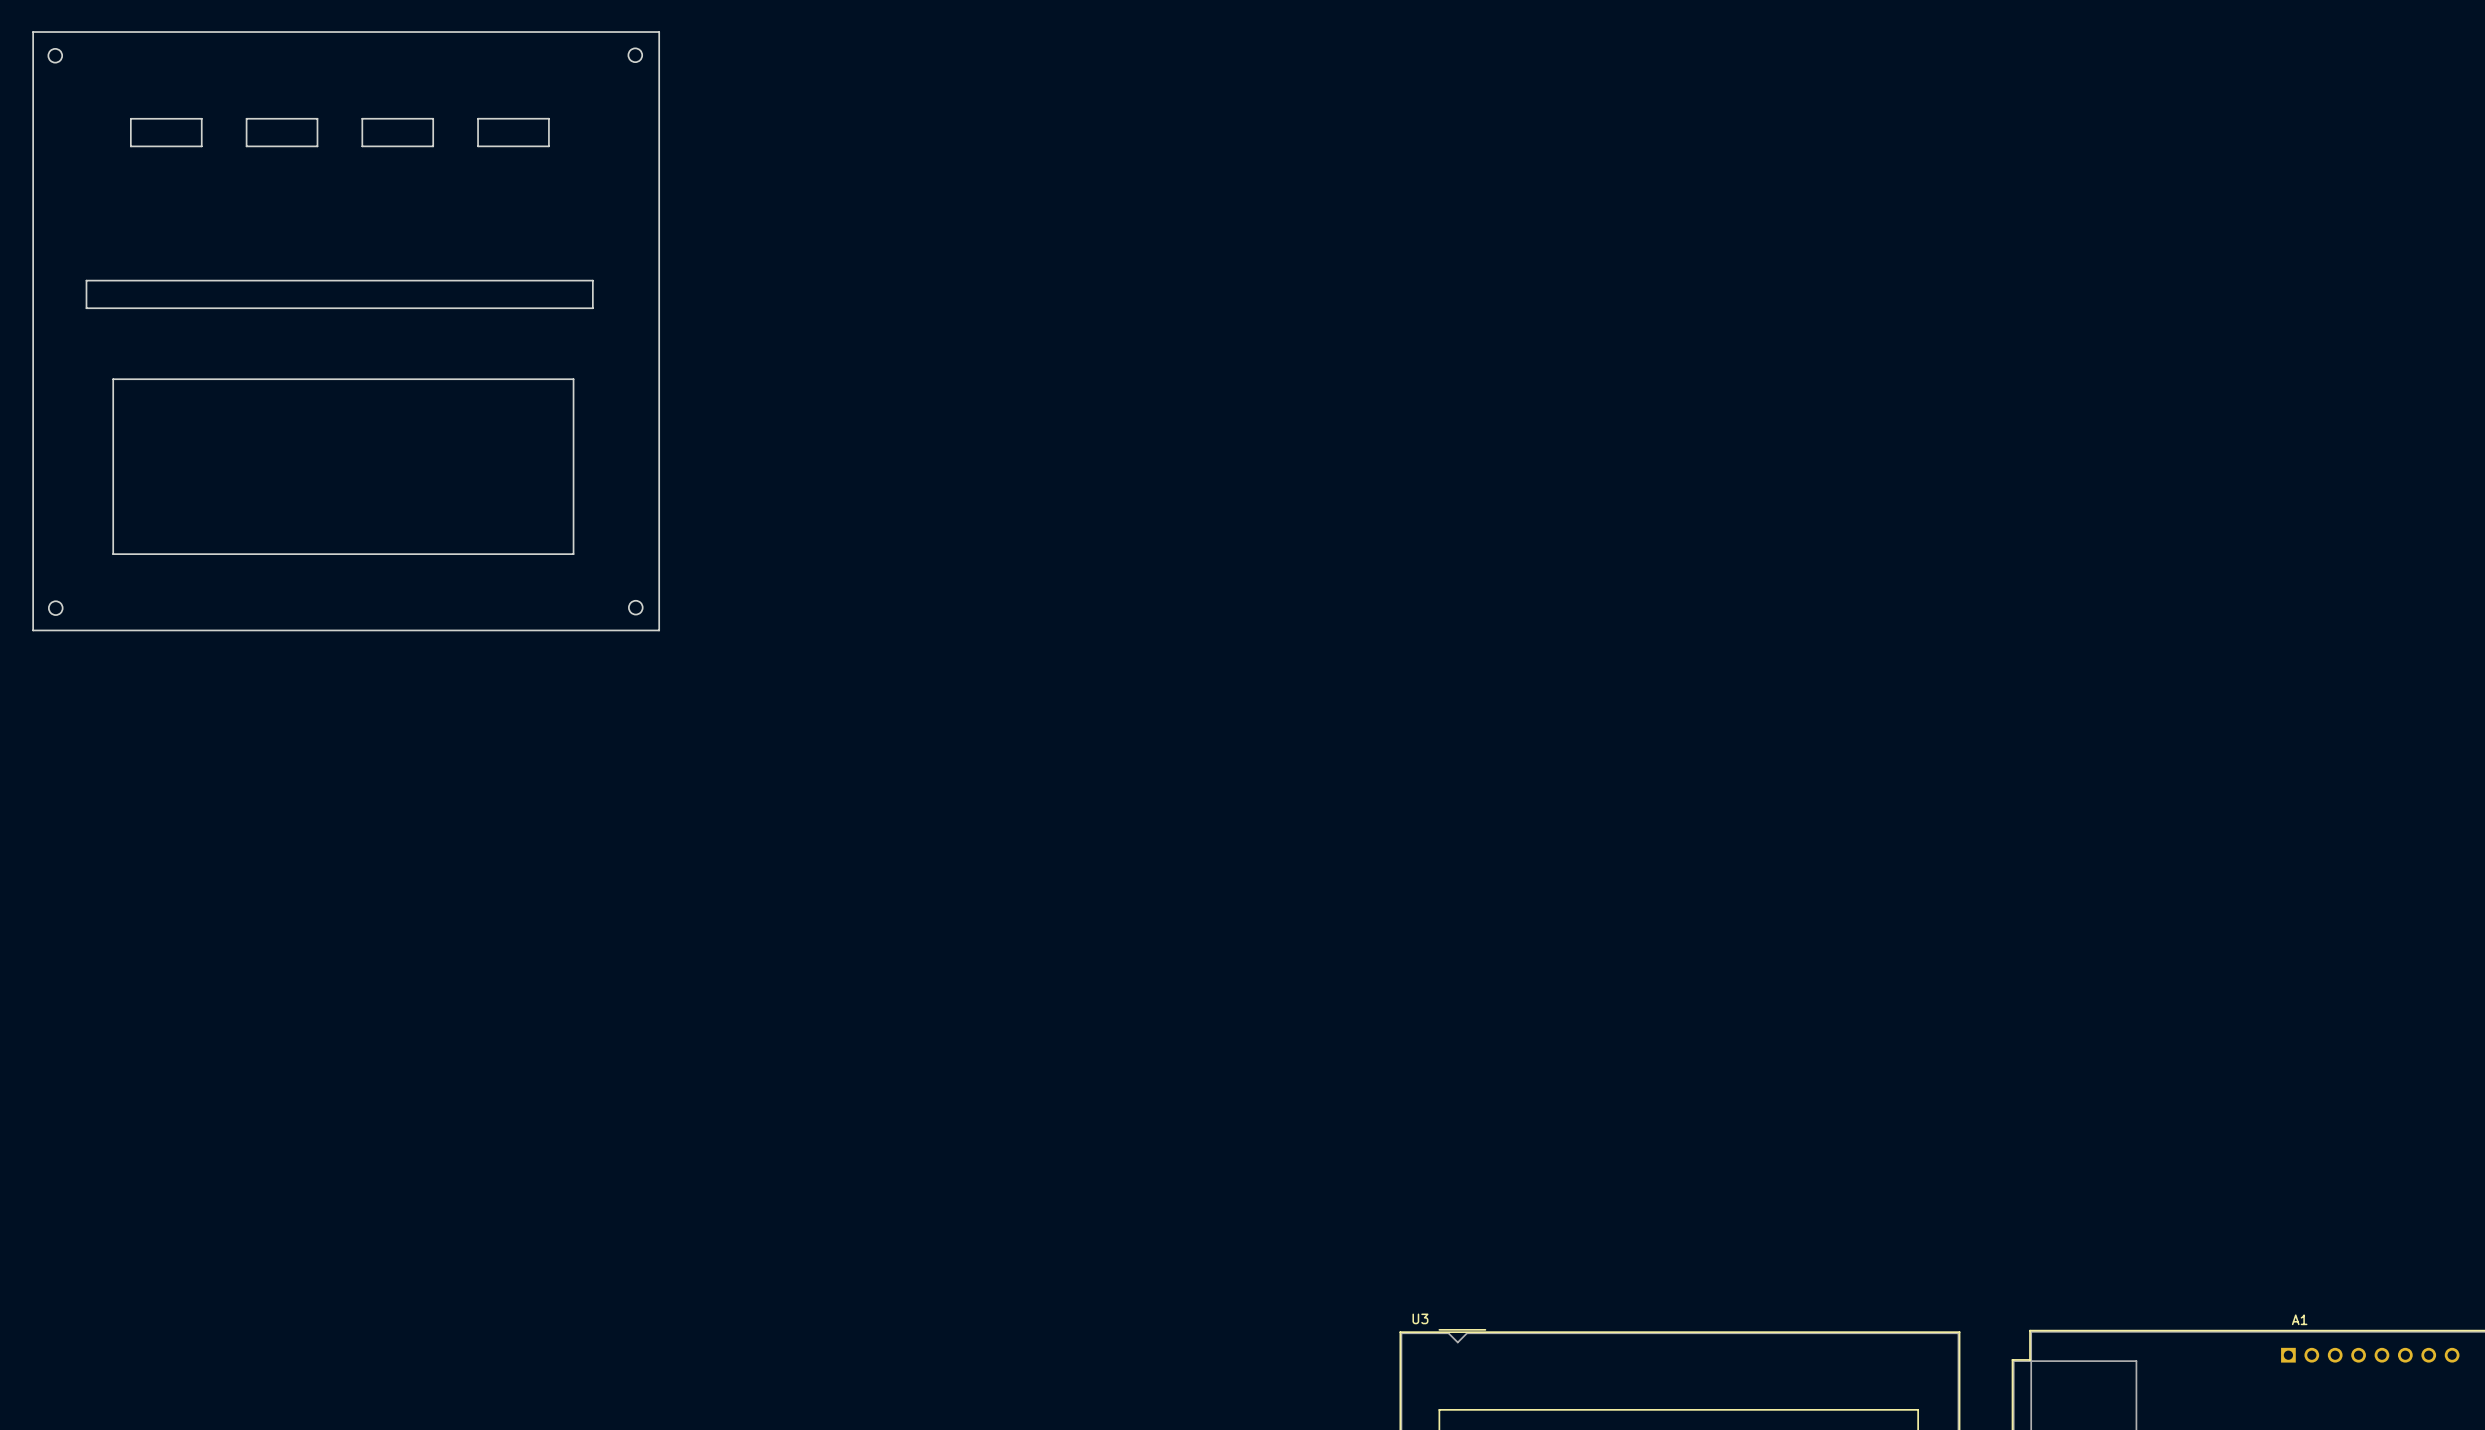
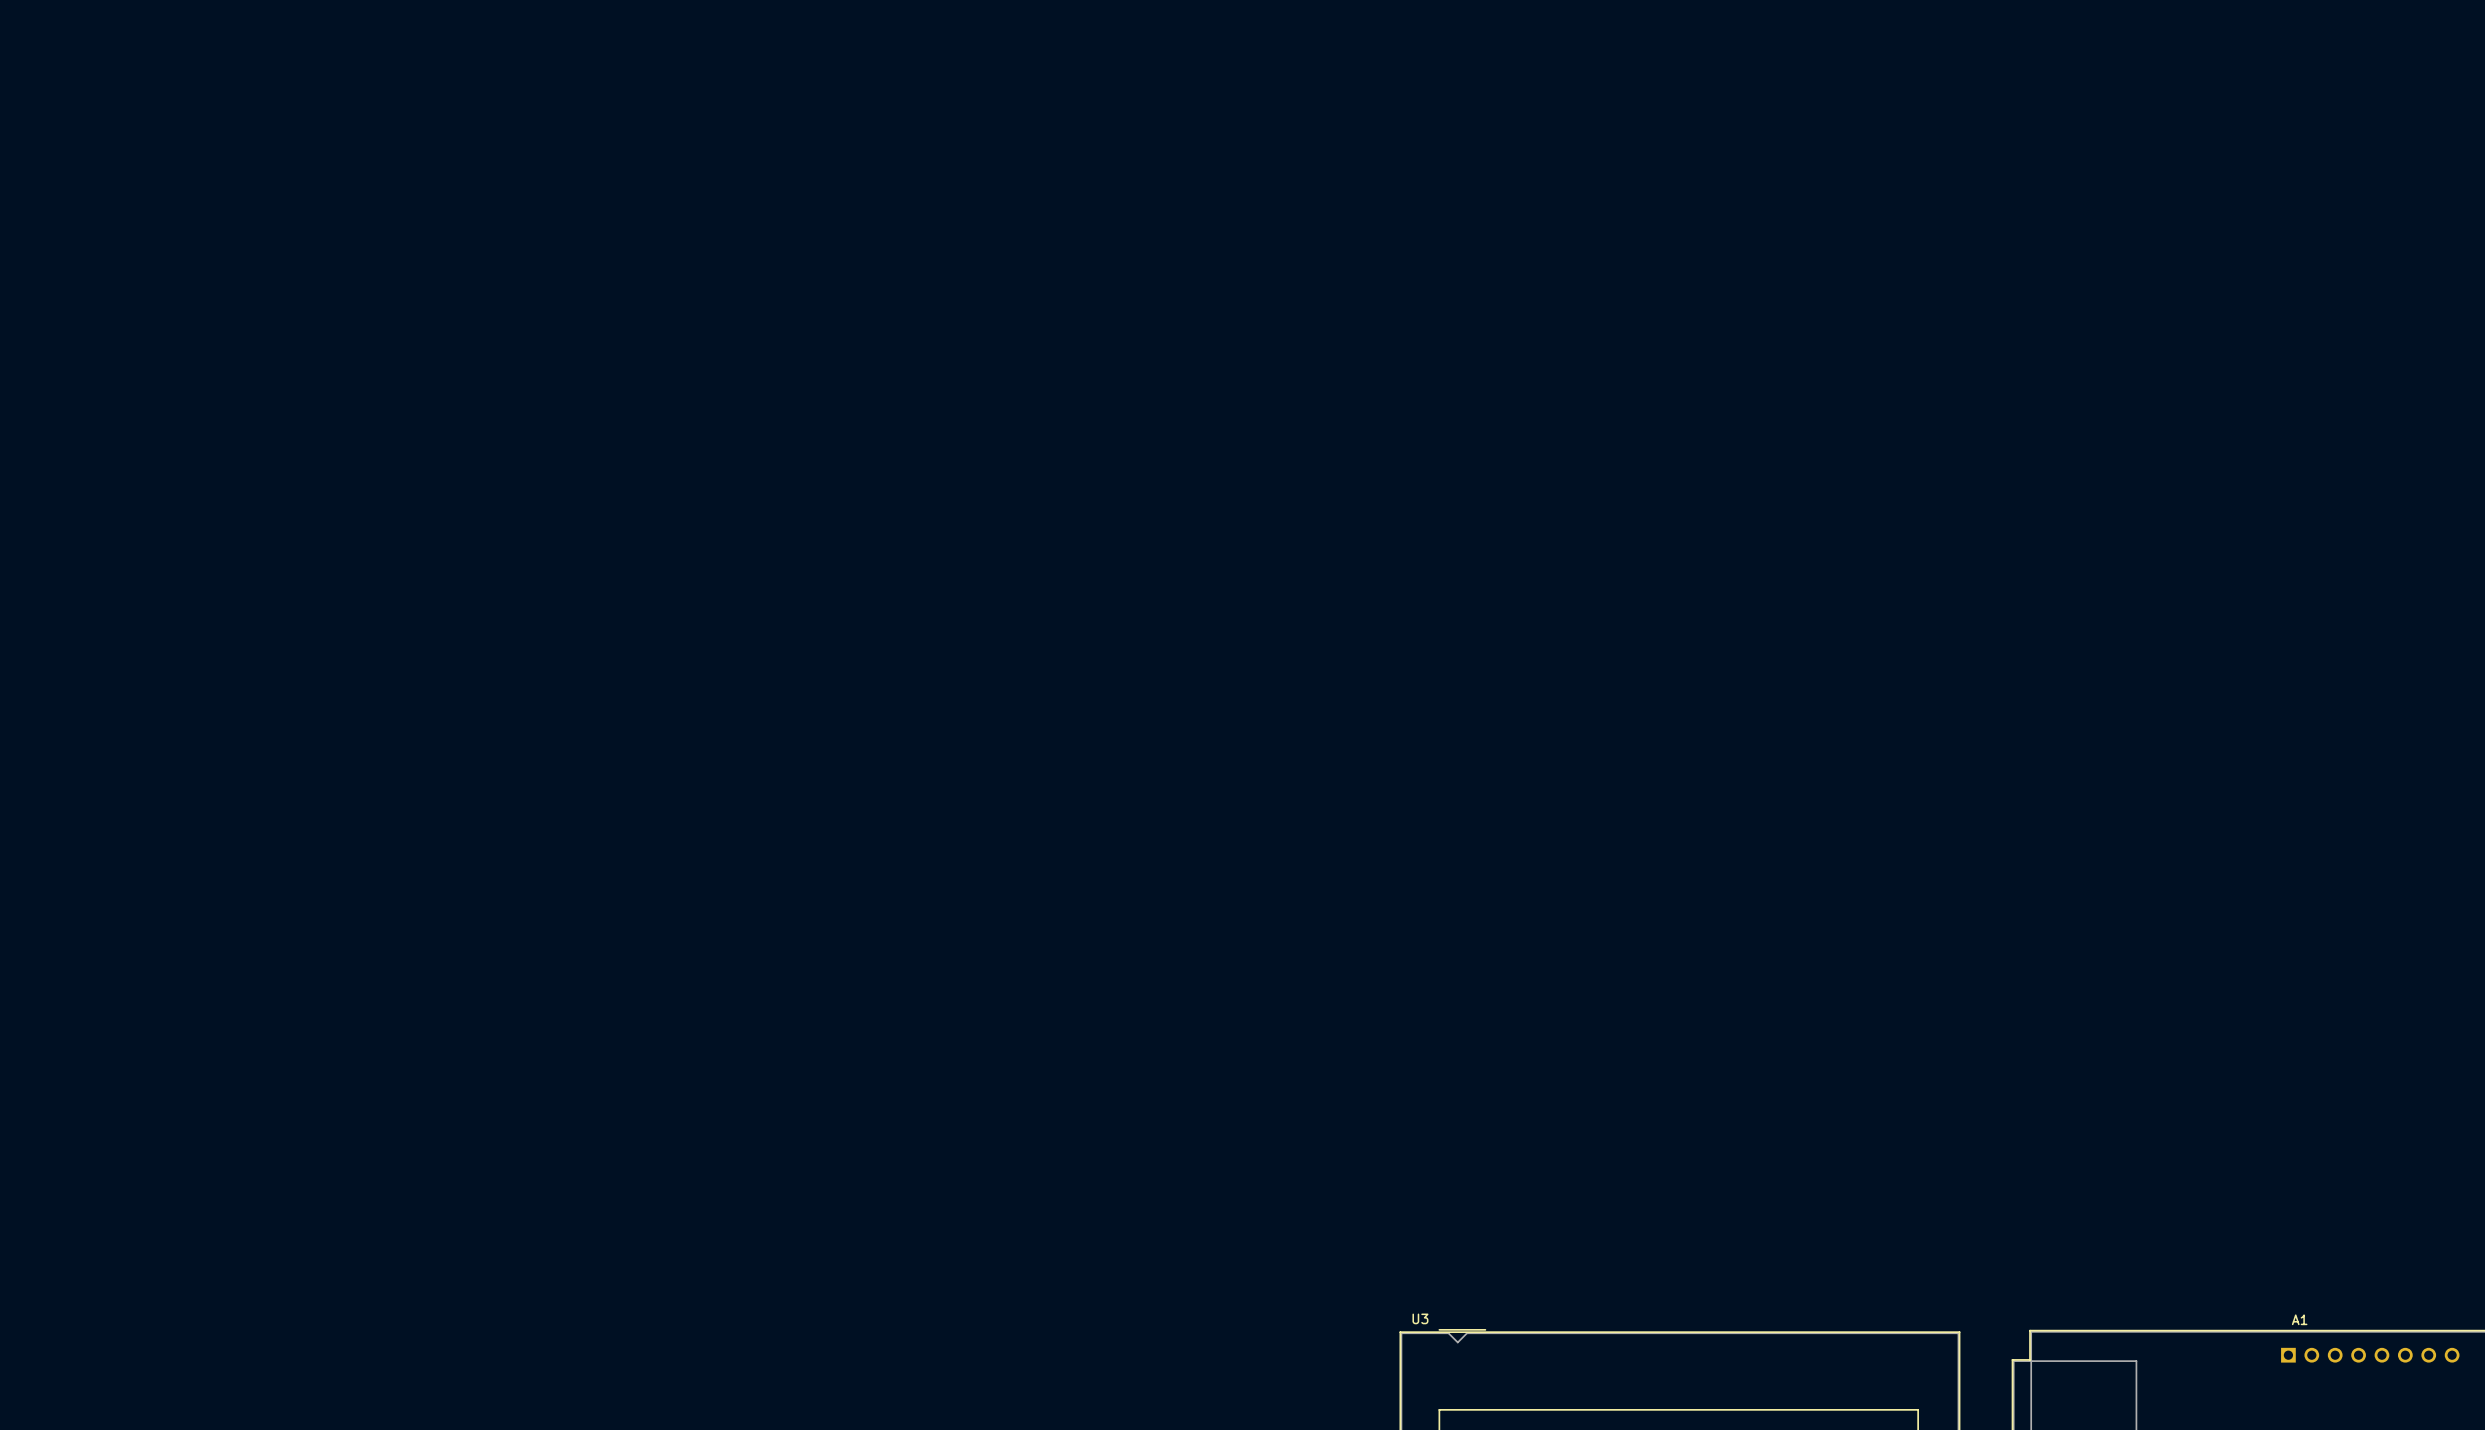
board edge: (33, 32) (659, 32) (659, 630) (33, 630) (33, 32) -> none
round board edge: [48, 48, 63, 63] -> none
round board edge: [628, 48, 643, 63] -> none
board edge: (130, 118) (201, 118) (201, 146) (130, 146) (130, 118) -> none
board edge: (246, 118) (317, 118) (317, 146) (246, 146) (246, 118) -> none
board edge: (362, 118) (433, 118) (433, 146) (362, 146) (362, 118) -> none
board edge: (478, 118) (548, 118) (548, 146) (478, 146) (478, 118) -> none
board edge: (86, 280) (592, 280) (592, 308) (86, 308) (86, 280) -> none
board edge: (113, 379) (573, 379) (573, 554) (113, 554) (113, 379) -> none
round board edge: [628, 600, 643, 615] -> none
round board edge: [48, 601, 63, 616] -> none

